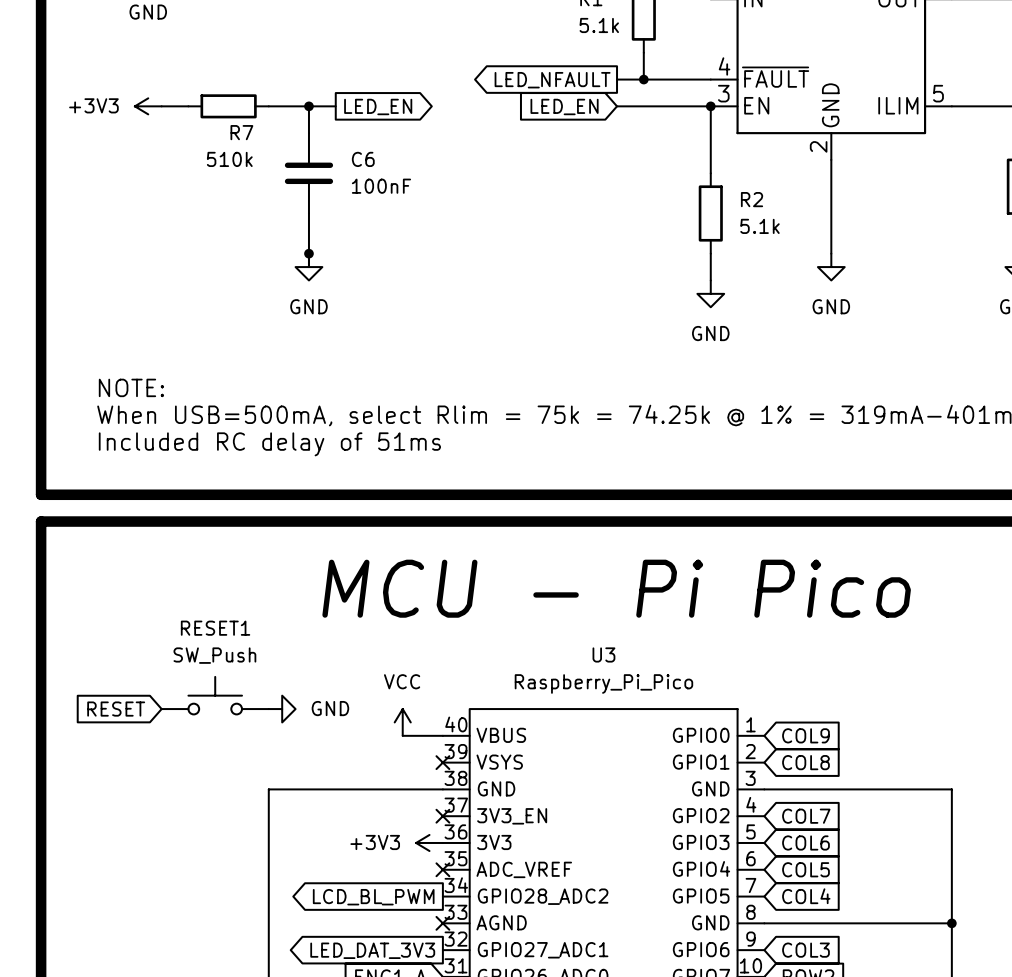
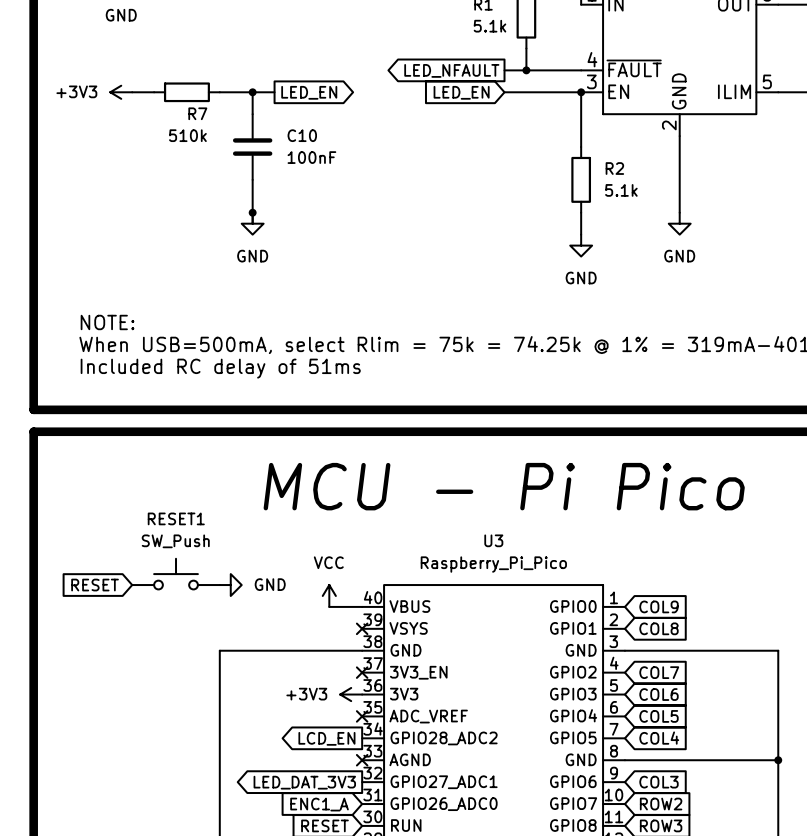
C6 name: C6 (363, 159) -> C10 (302, 135)
global label: LCD_BL_PWM (373, 897) -> LCD_EN (326, 738)

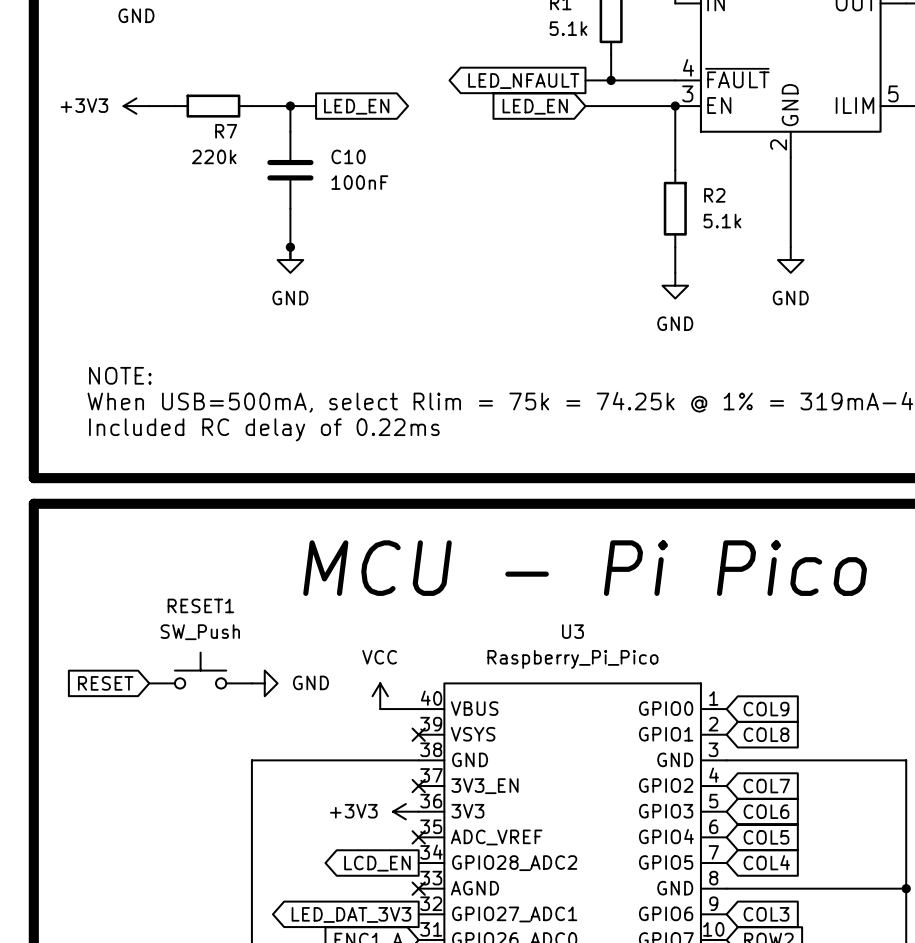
R7 value: 510k (187, 135) -> 220k (214, 156)
text: Included RC delay of 51ms (220, 368) -> Included RC delay of 0.22ms (264, 429)

